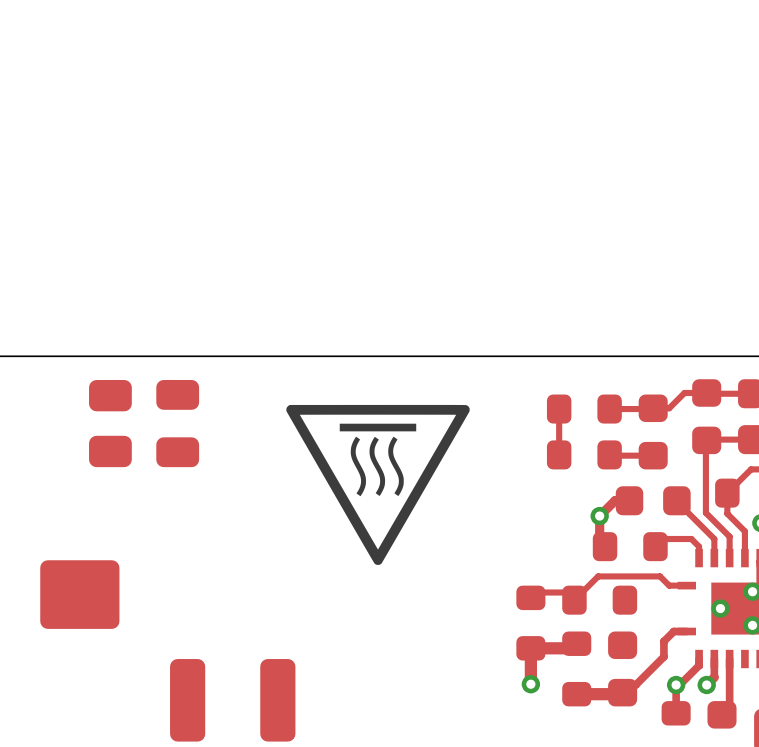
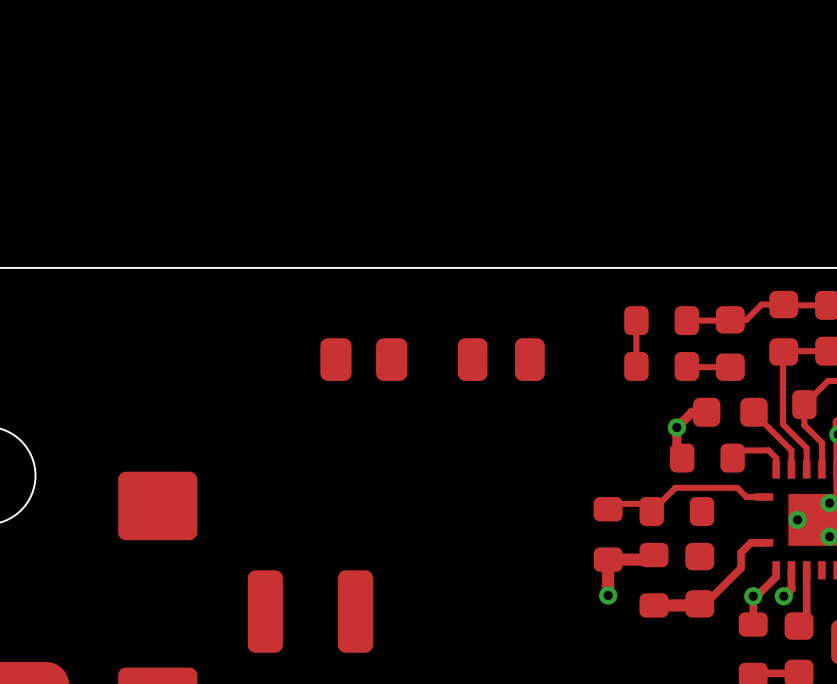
drawing: [286, 404, 470, 565] -> none
part rotation: 0° (110, 423) -> 90° clockwise (363, 359)
part position: (110, 423) -> (363, 359)
part rotation: 0° (177, 423) -> 90° clockwise (501, 359)
part position: (177, 423) -> (501, 359)

